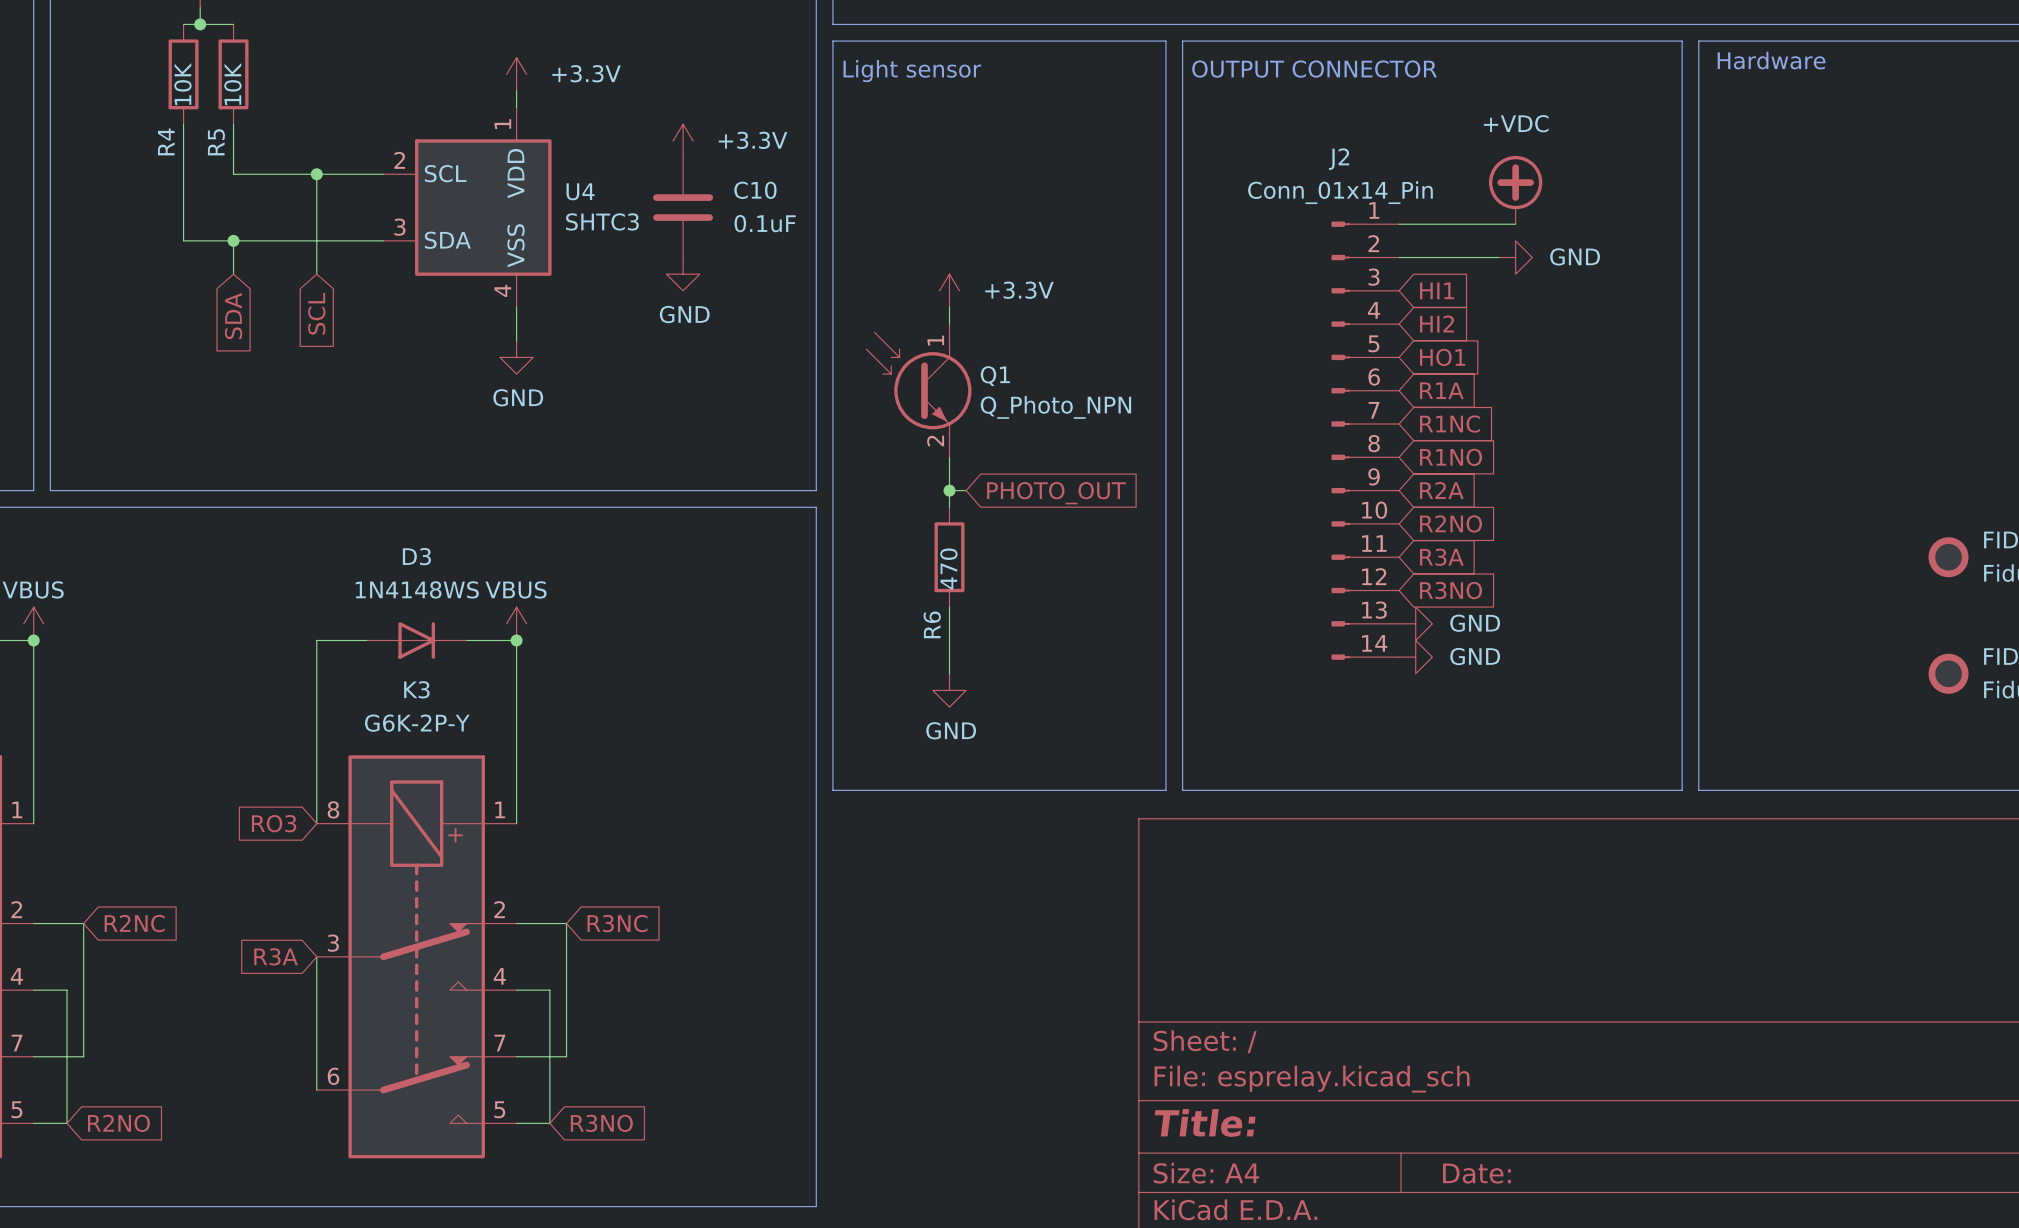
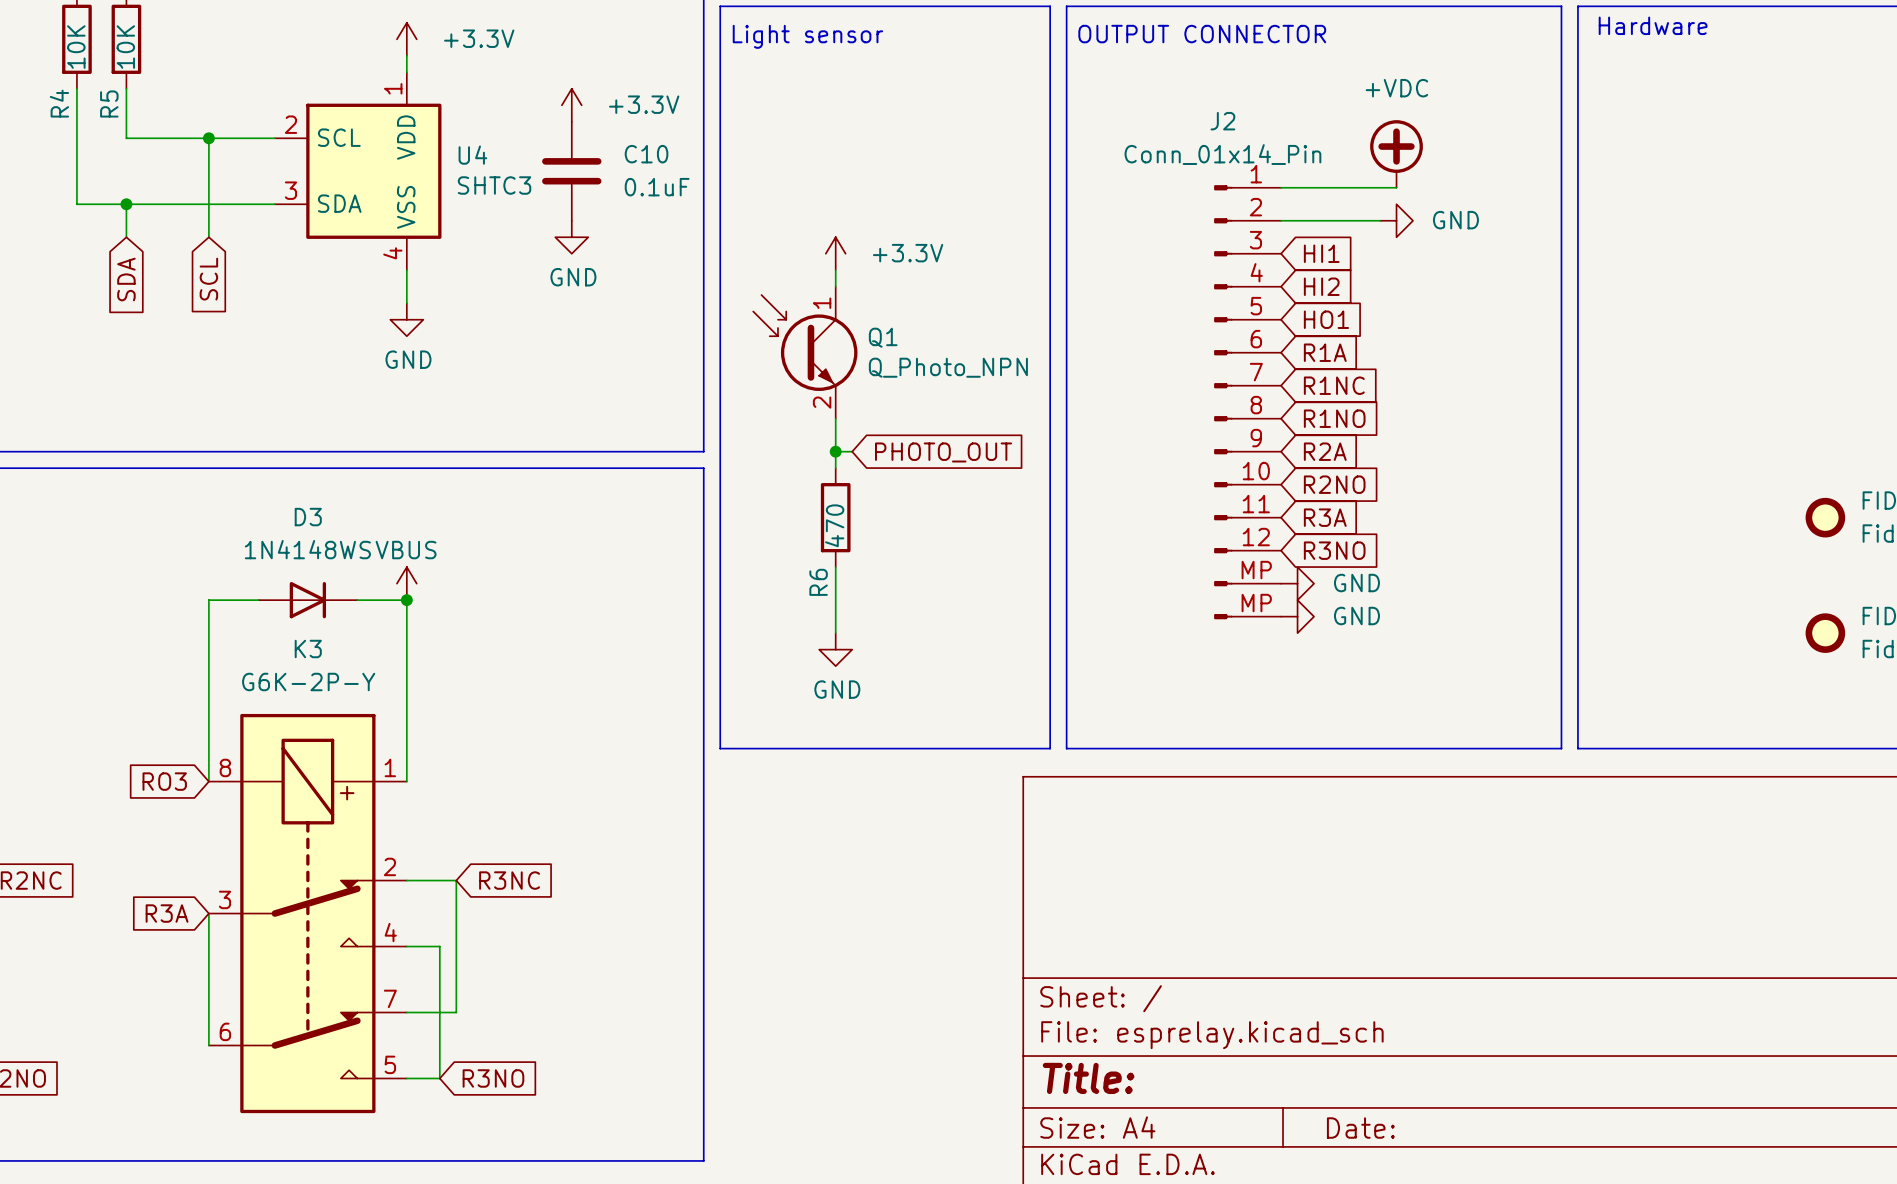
J2 pin number: 13 (1374, 610) -> MP (1256, 570)
J2 pin number: 14 (1374, 643) -> MP (1256, 603)

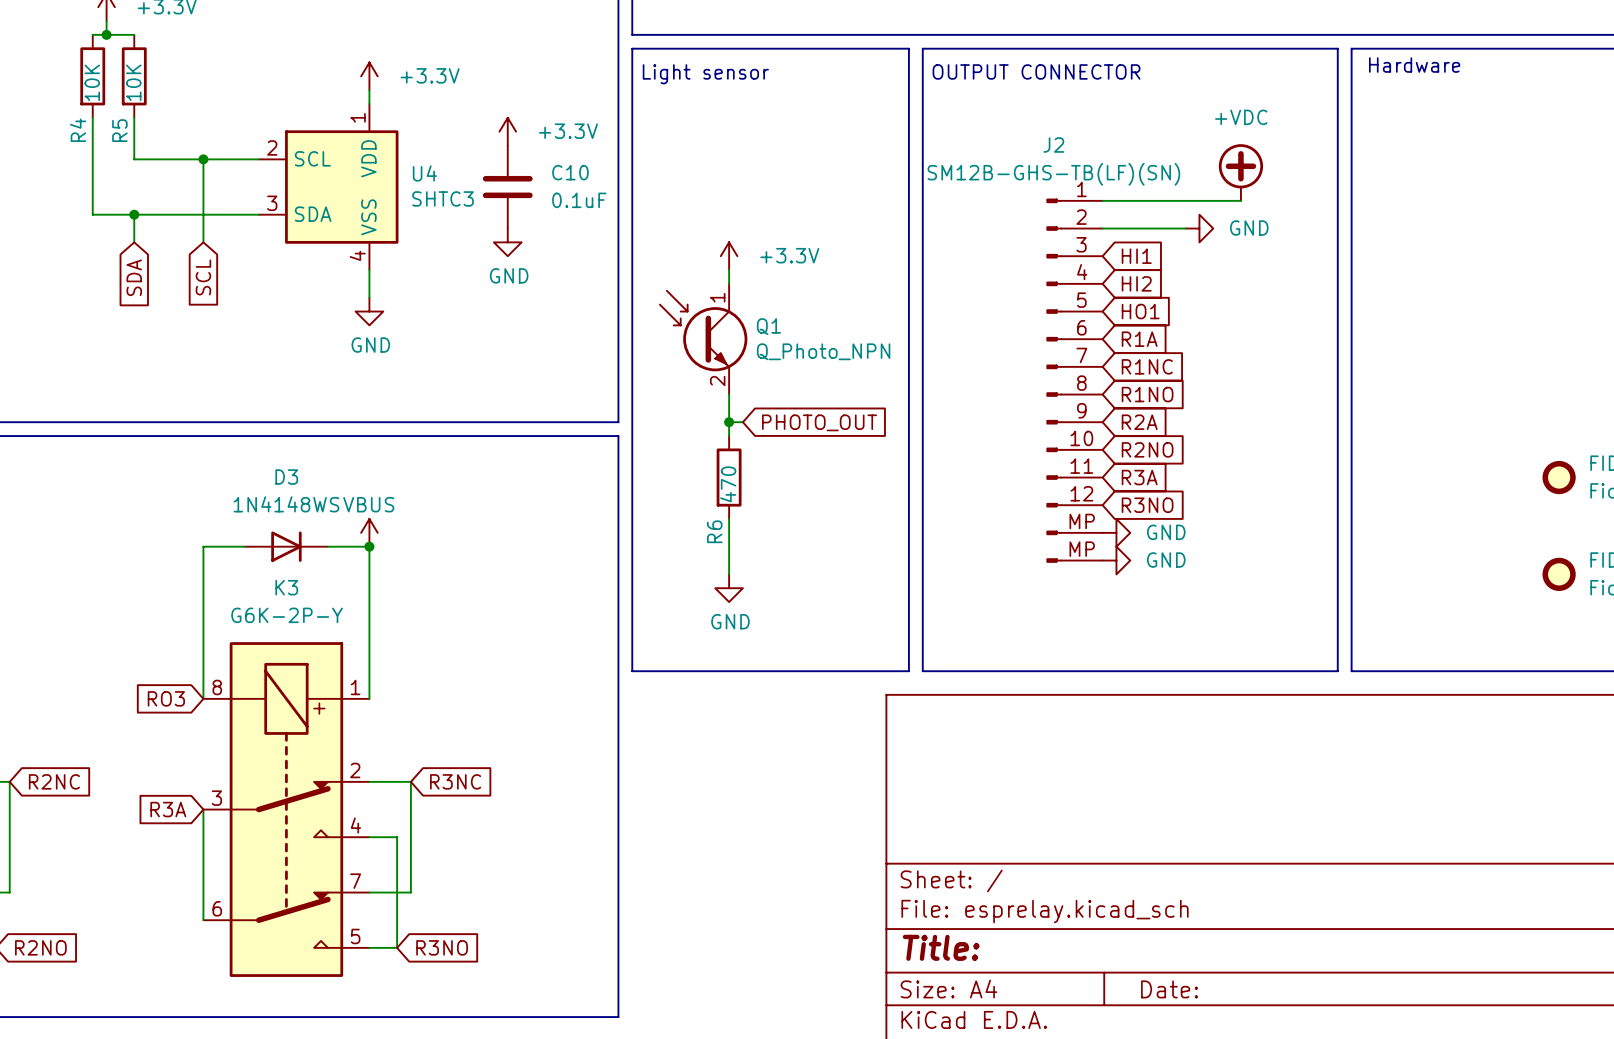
power symbol position: +VDC (1396, 153) -> +VDC (1240, 172)
J2 value: Conn_01x14_Pin (1222, 154) -> SM12B-GHS-TB(LF)(SN) (1053, 174)
wire: none -> (1199, 200) (1240, 200)

